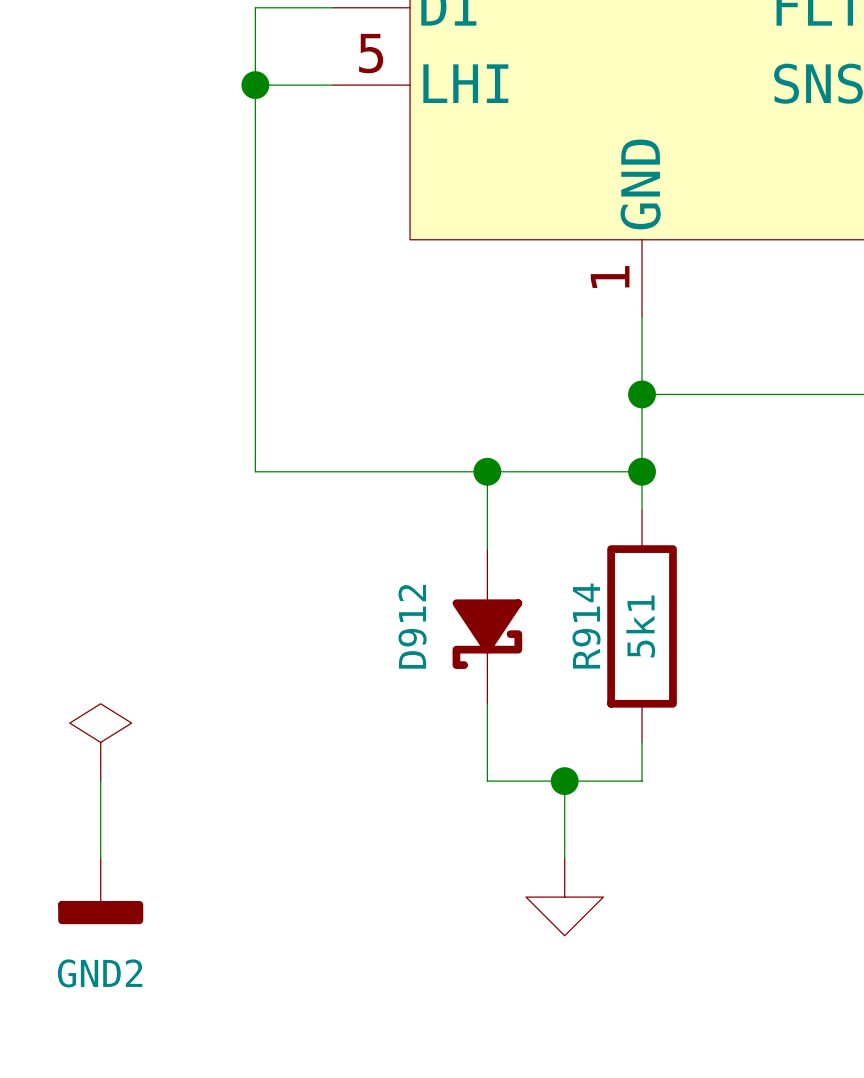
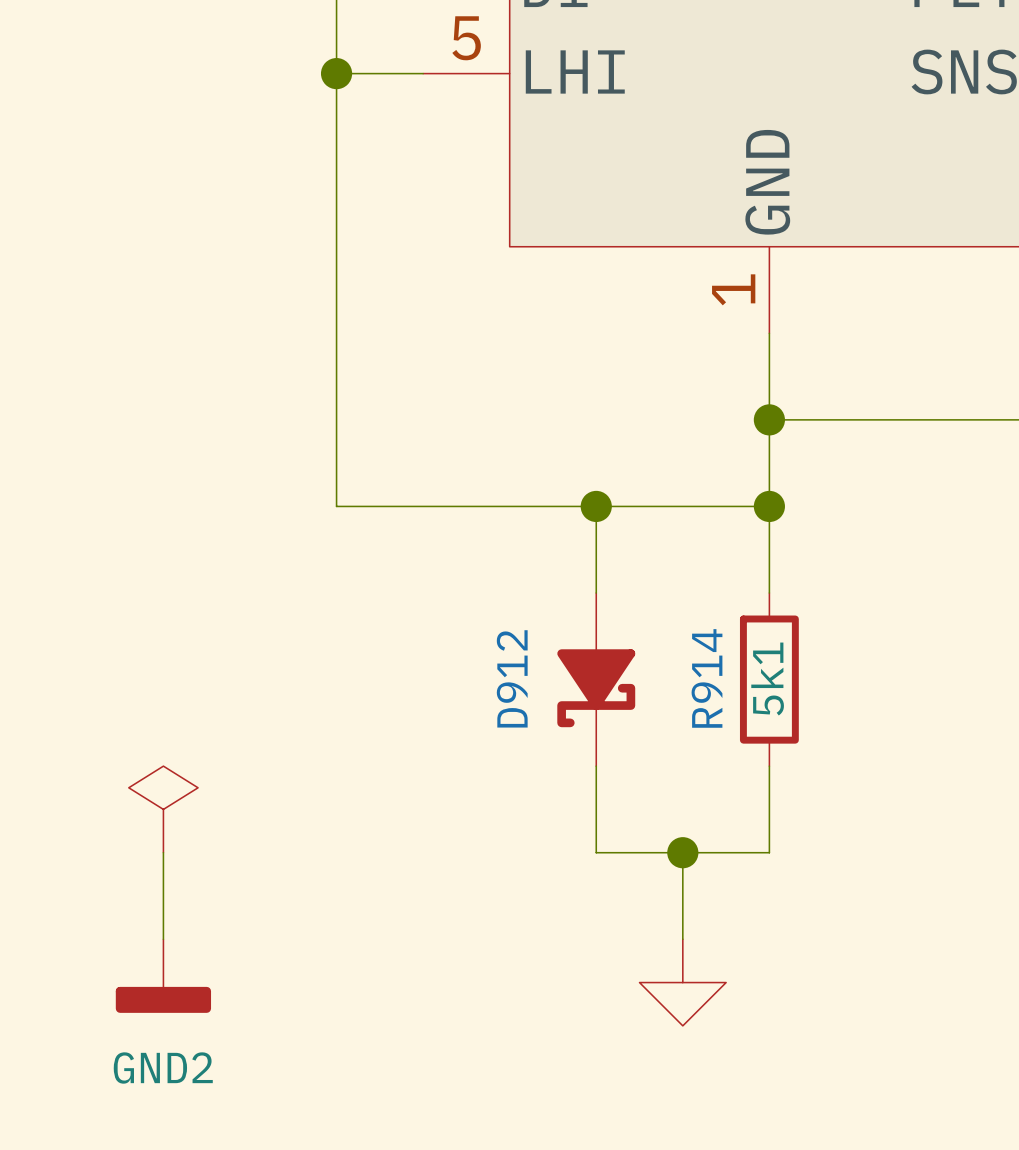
R914 symbol: [607, 510, 677, 743] -> [739, 593, 799, 767]

